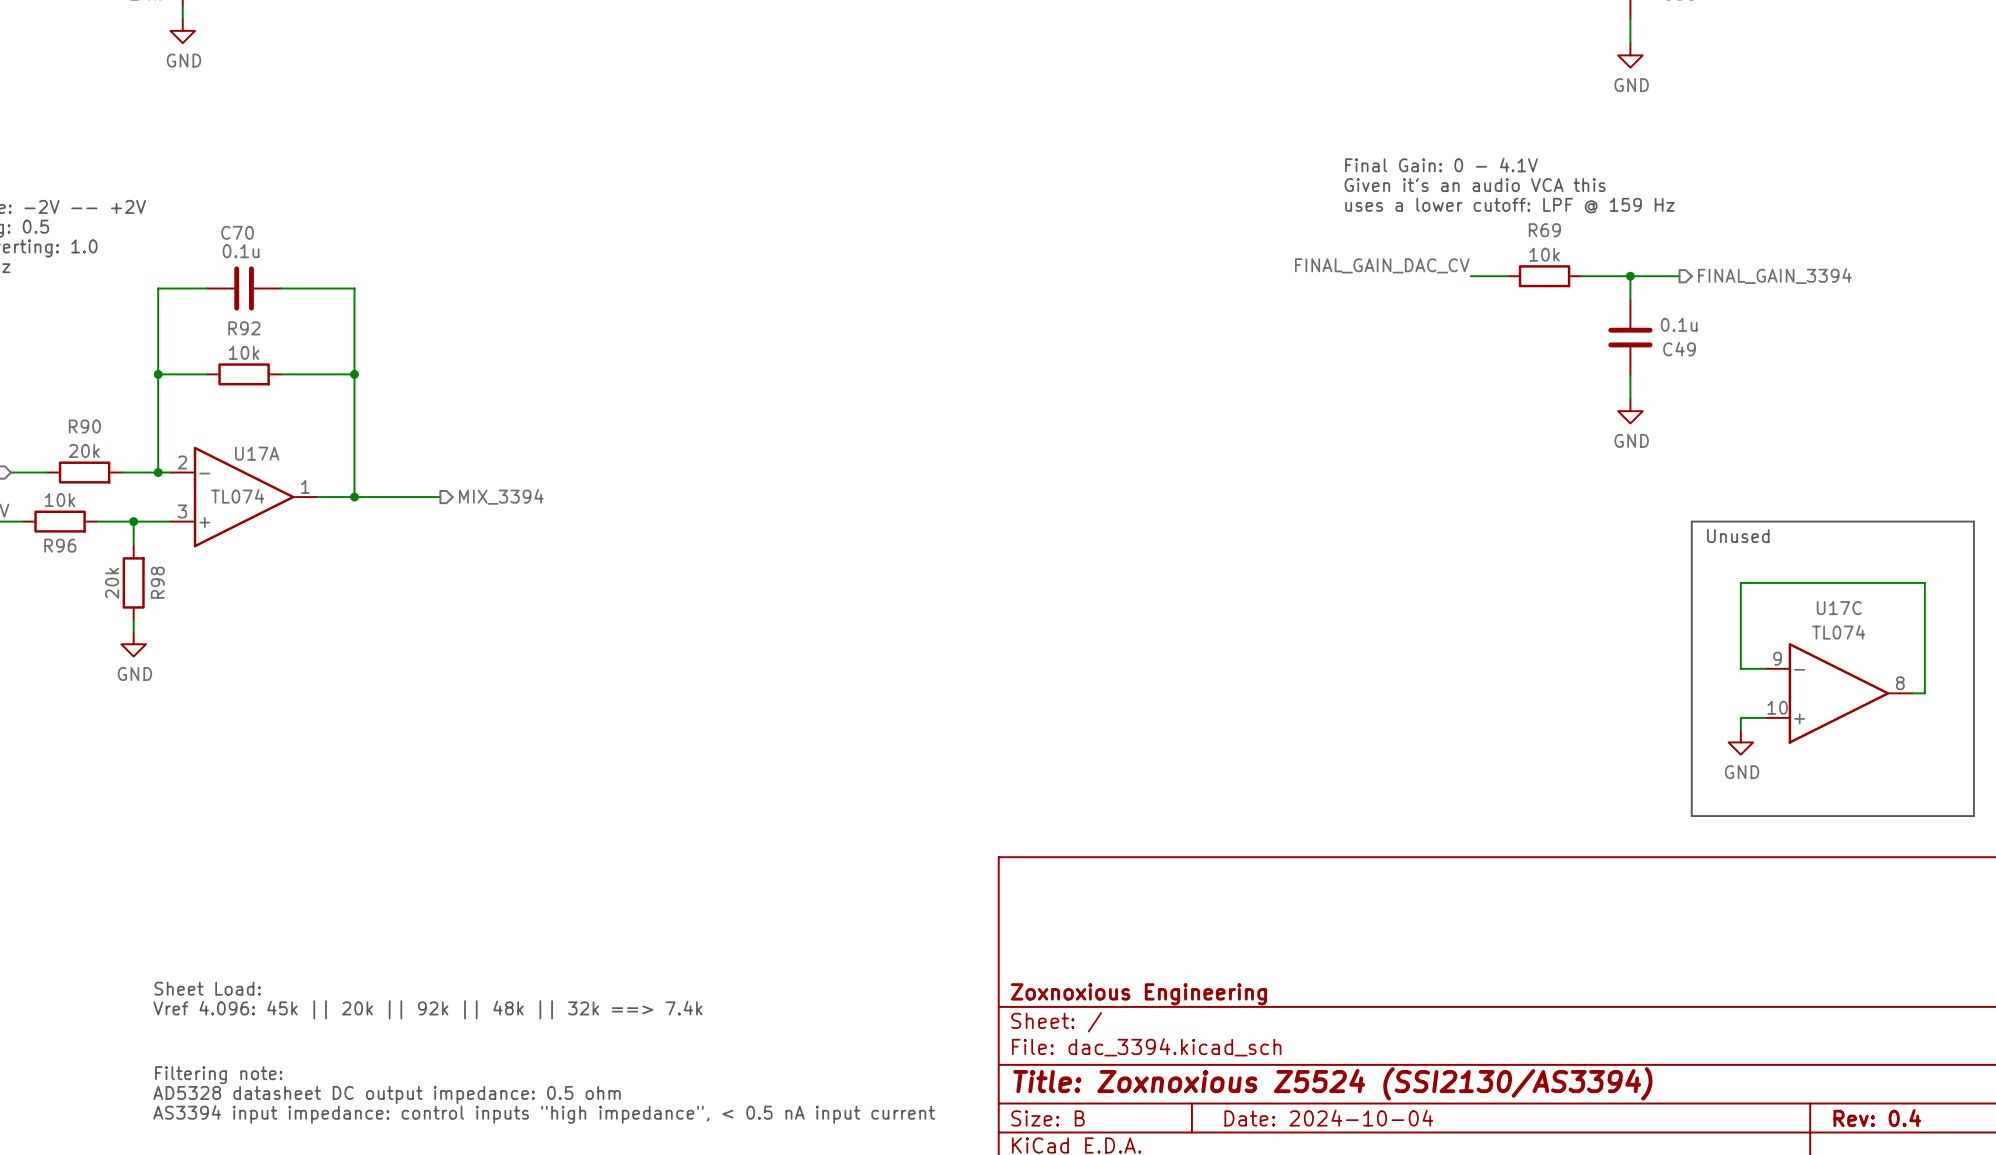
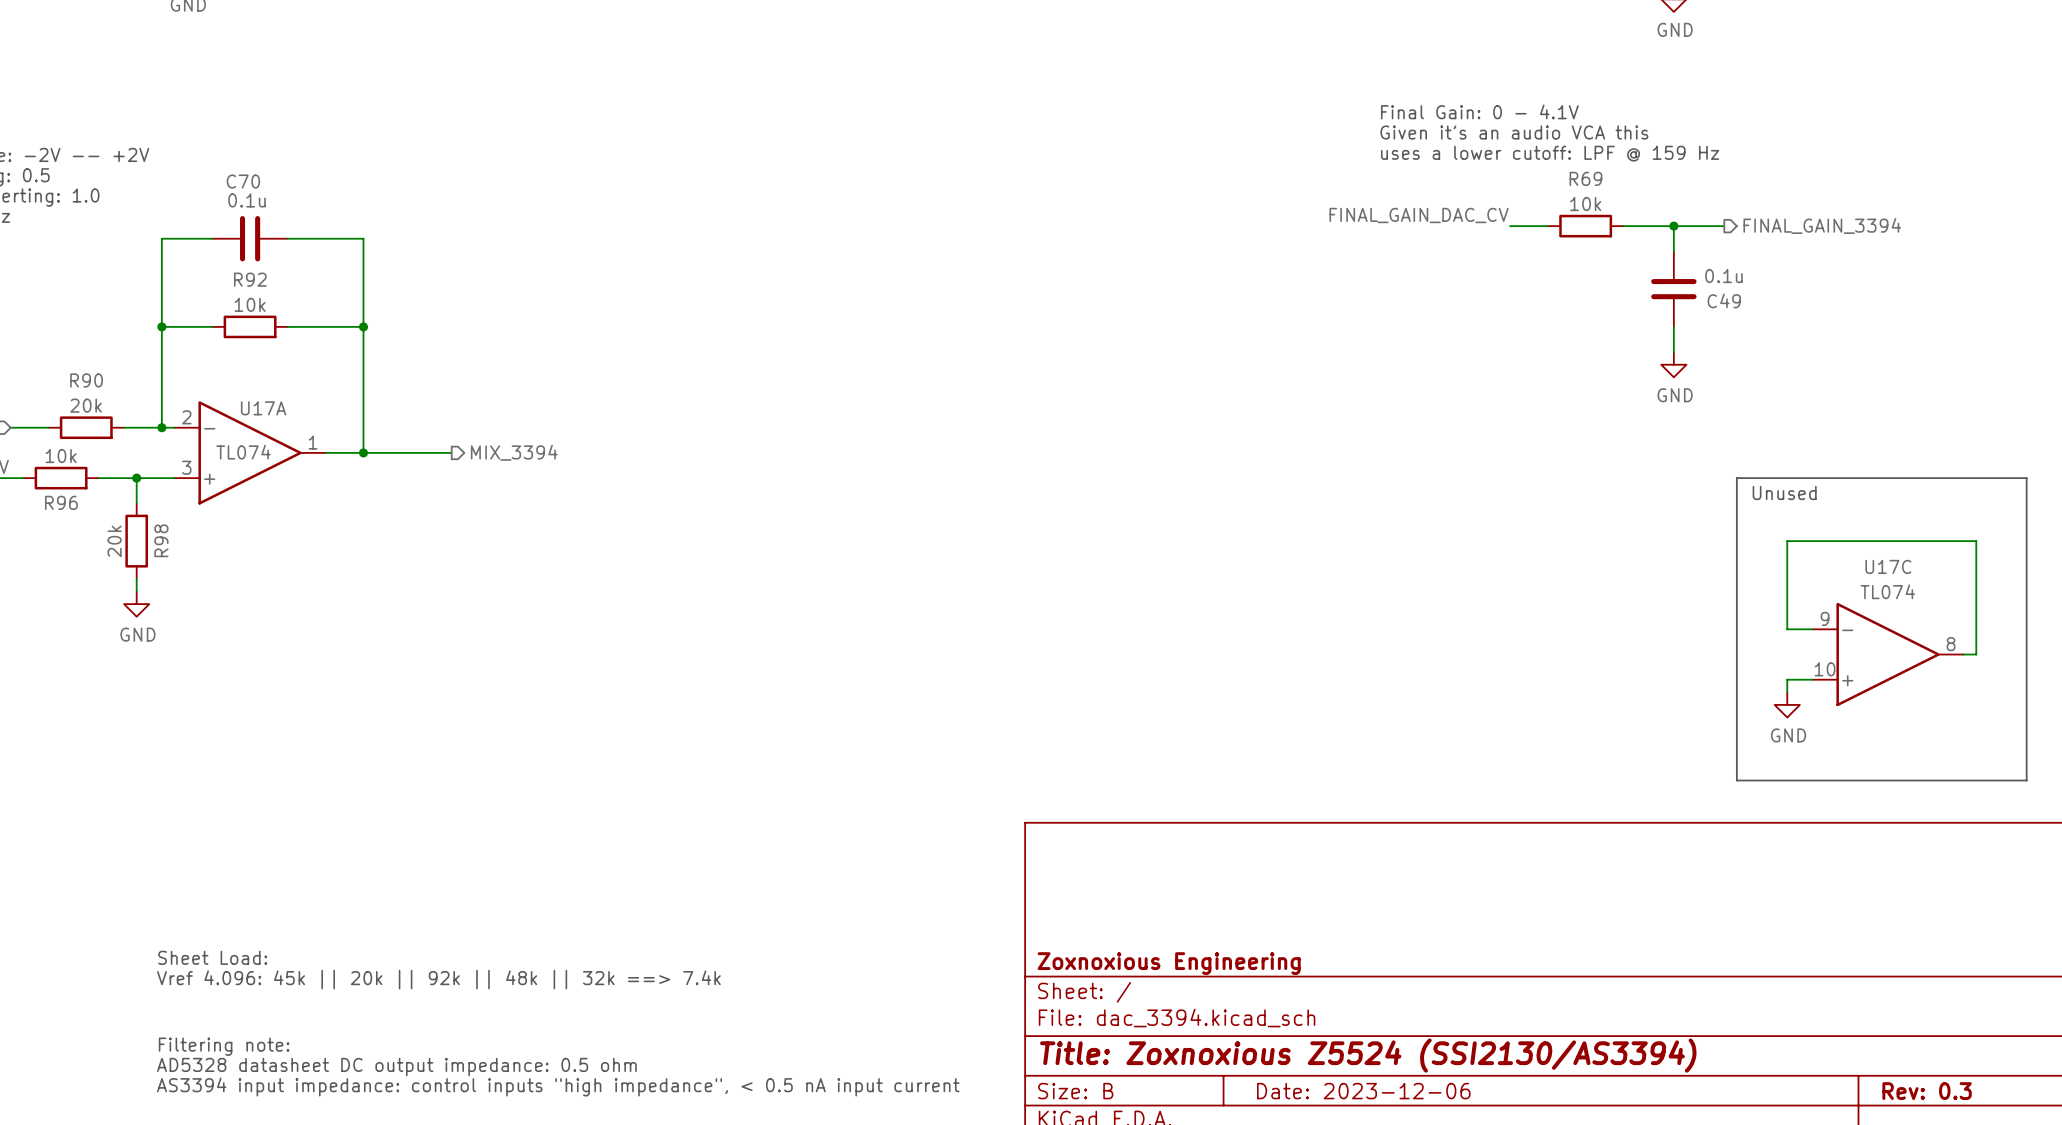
title block: Date: 2024-10-04 (1328, 1118) -> Date: 2023-12-06 (1363, 1091)
title block: Rev: 0.4 (1877, 1118) -> Rev: 0.3 (1927, 1091)

